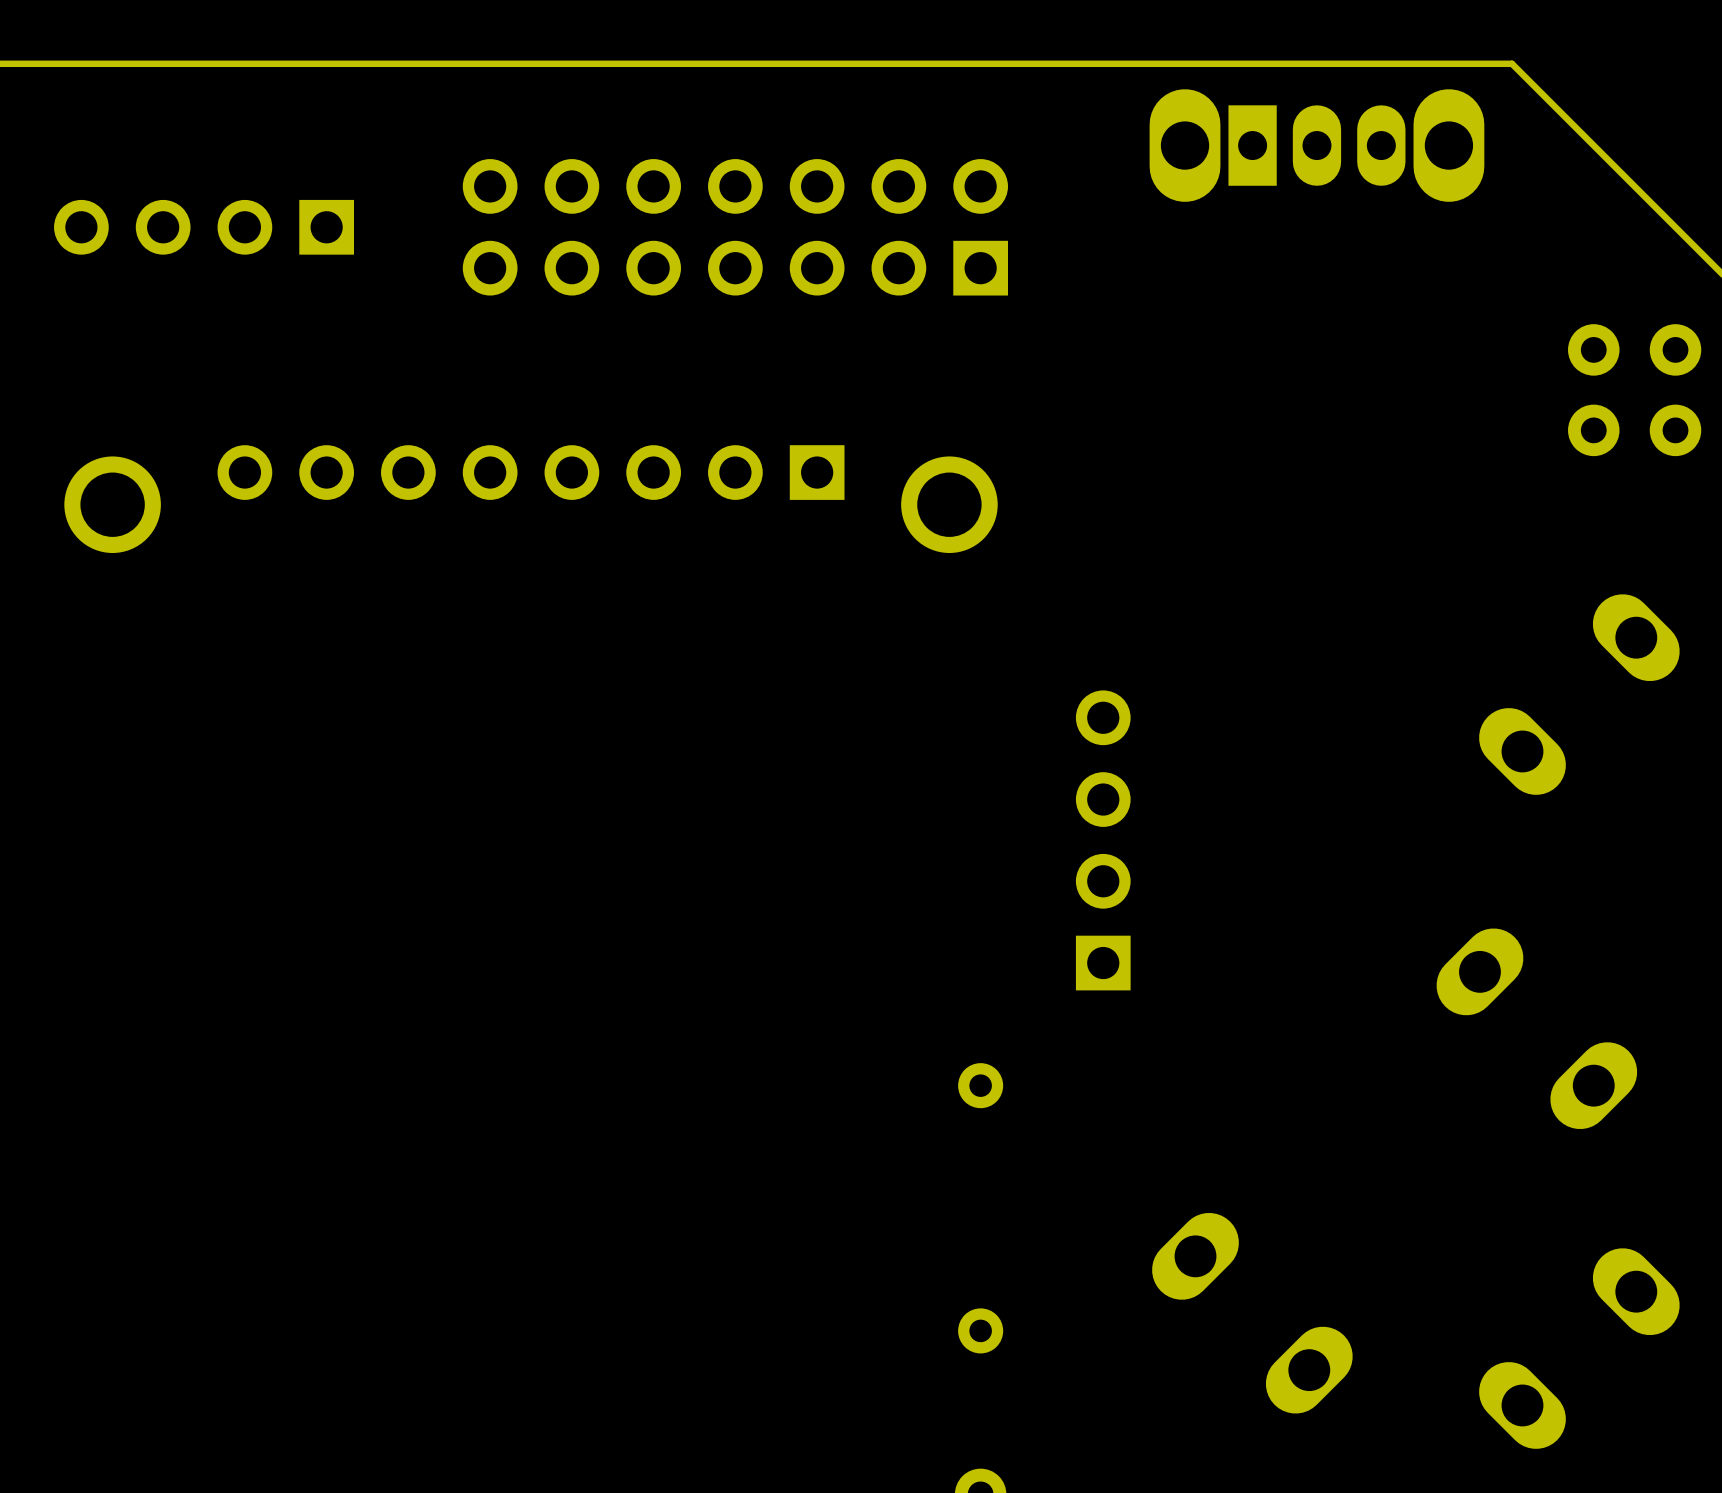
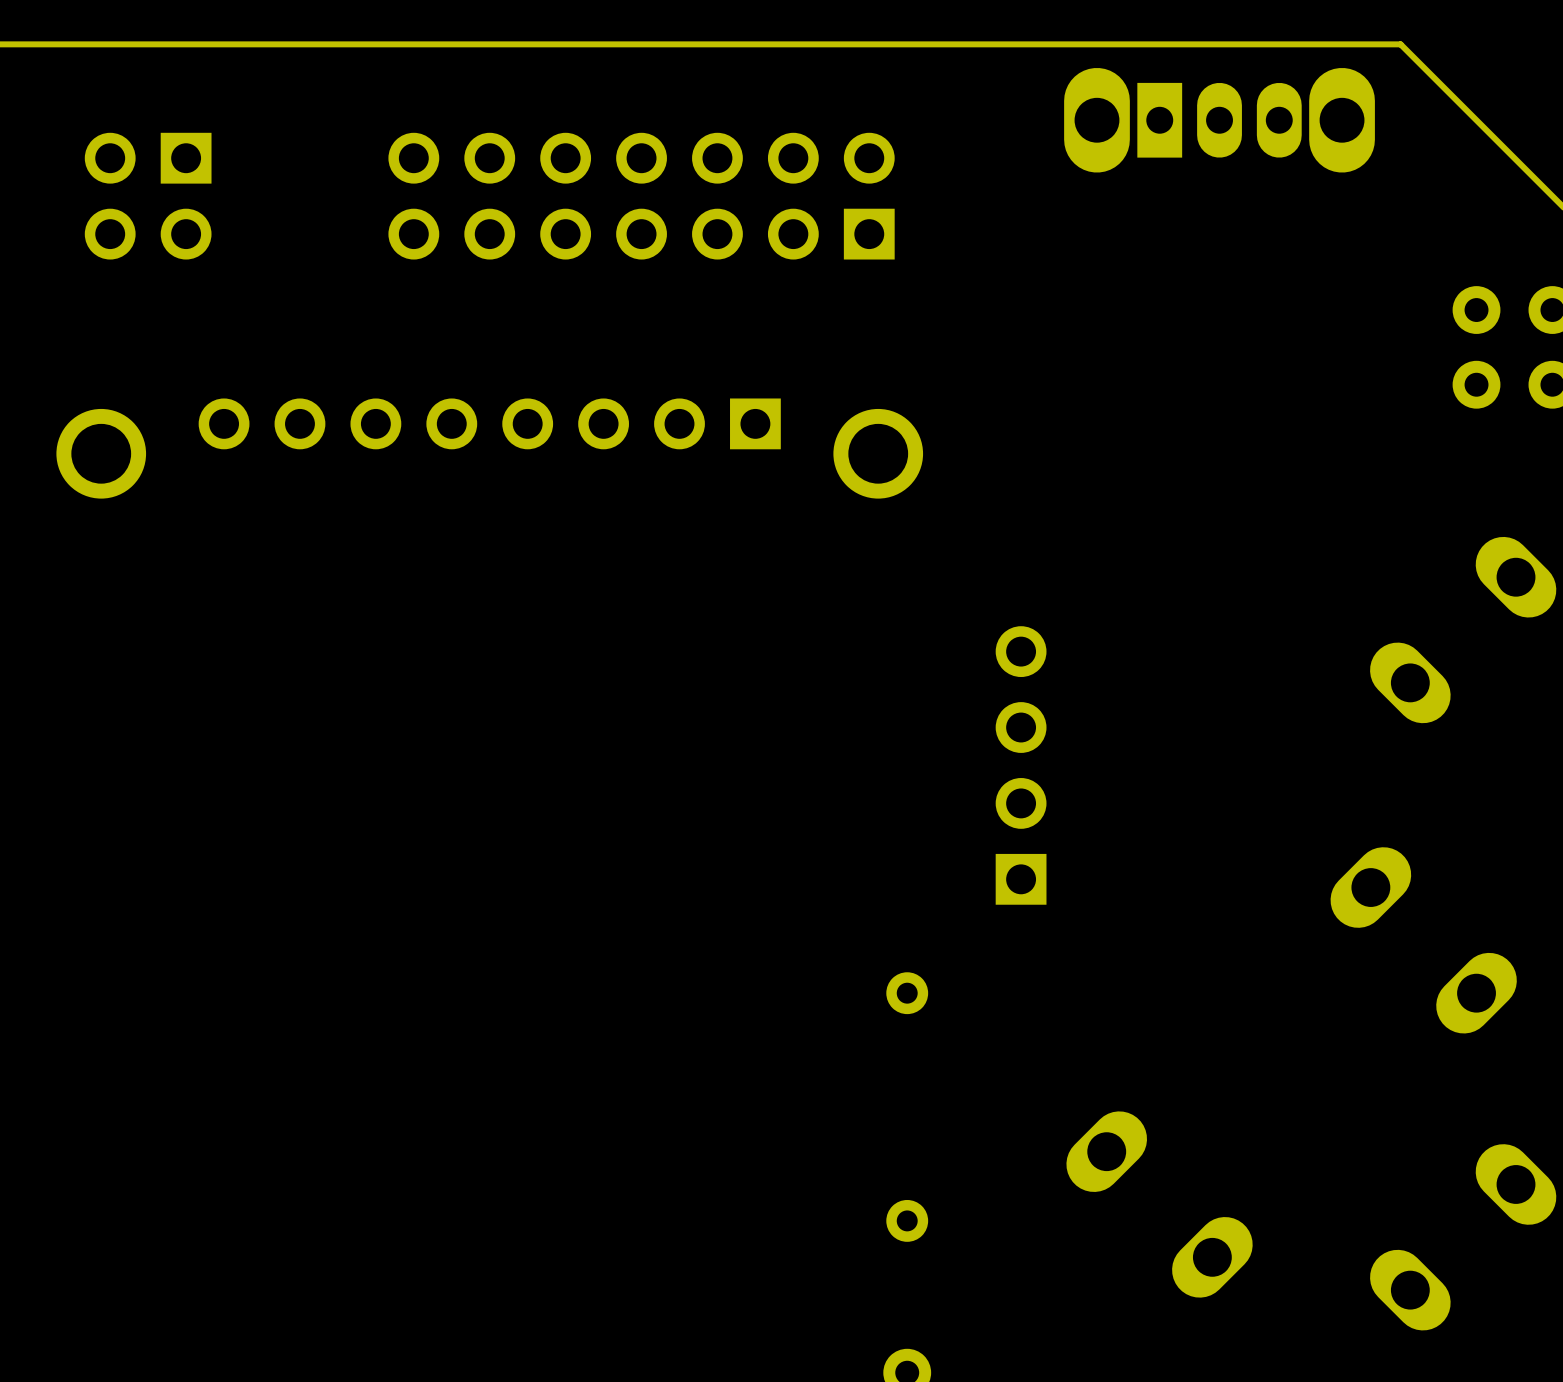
part: none -> (148, 196)
part: (204, 227) -> none
part position: (735, 227) -> (641, 196)

